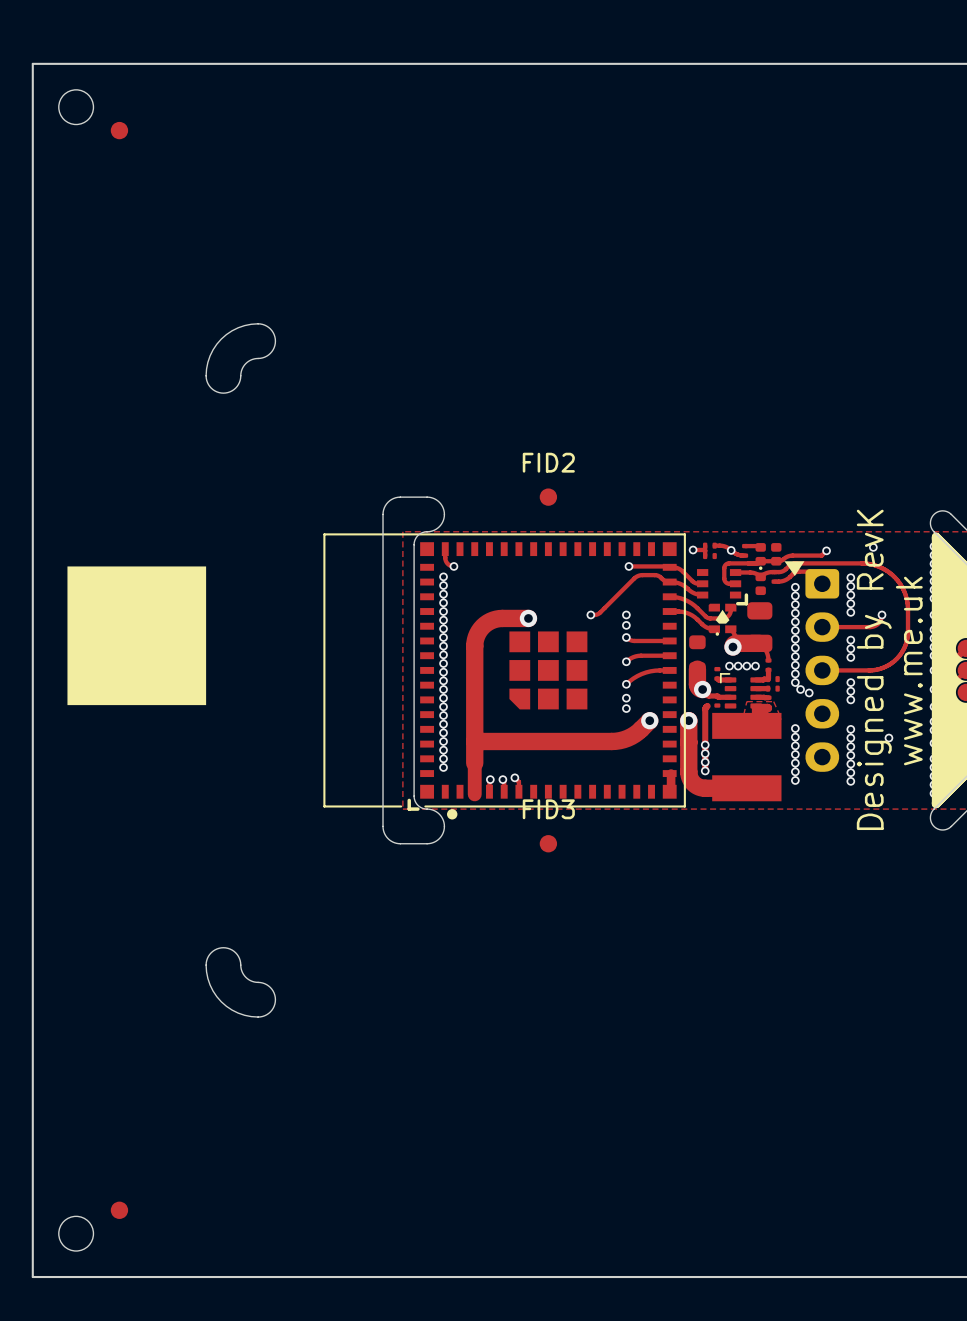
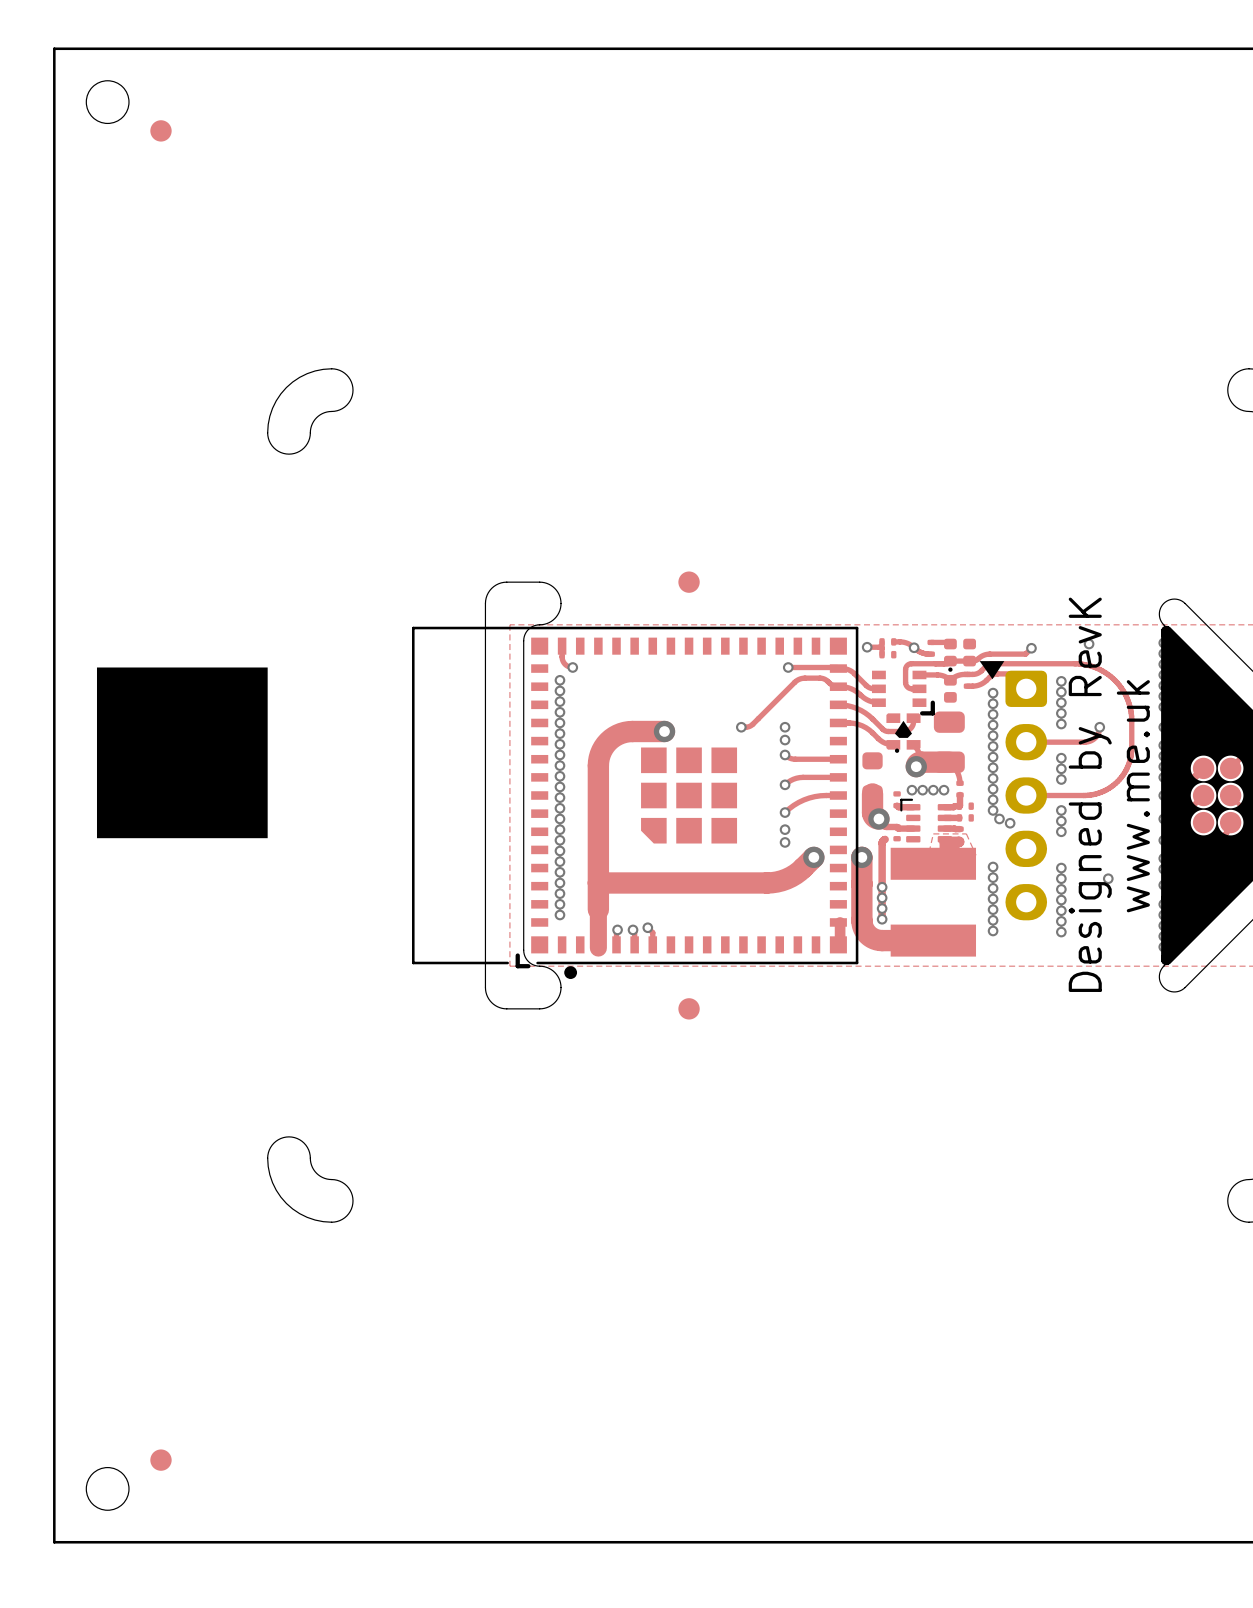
FID2 name: FID2 (548, 462) -> none
FID3 name: FID3 (548, 809) -> none

